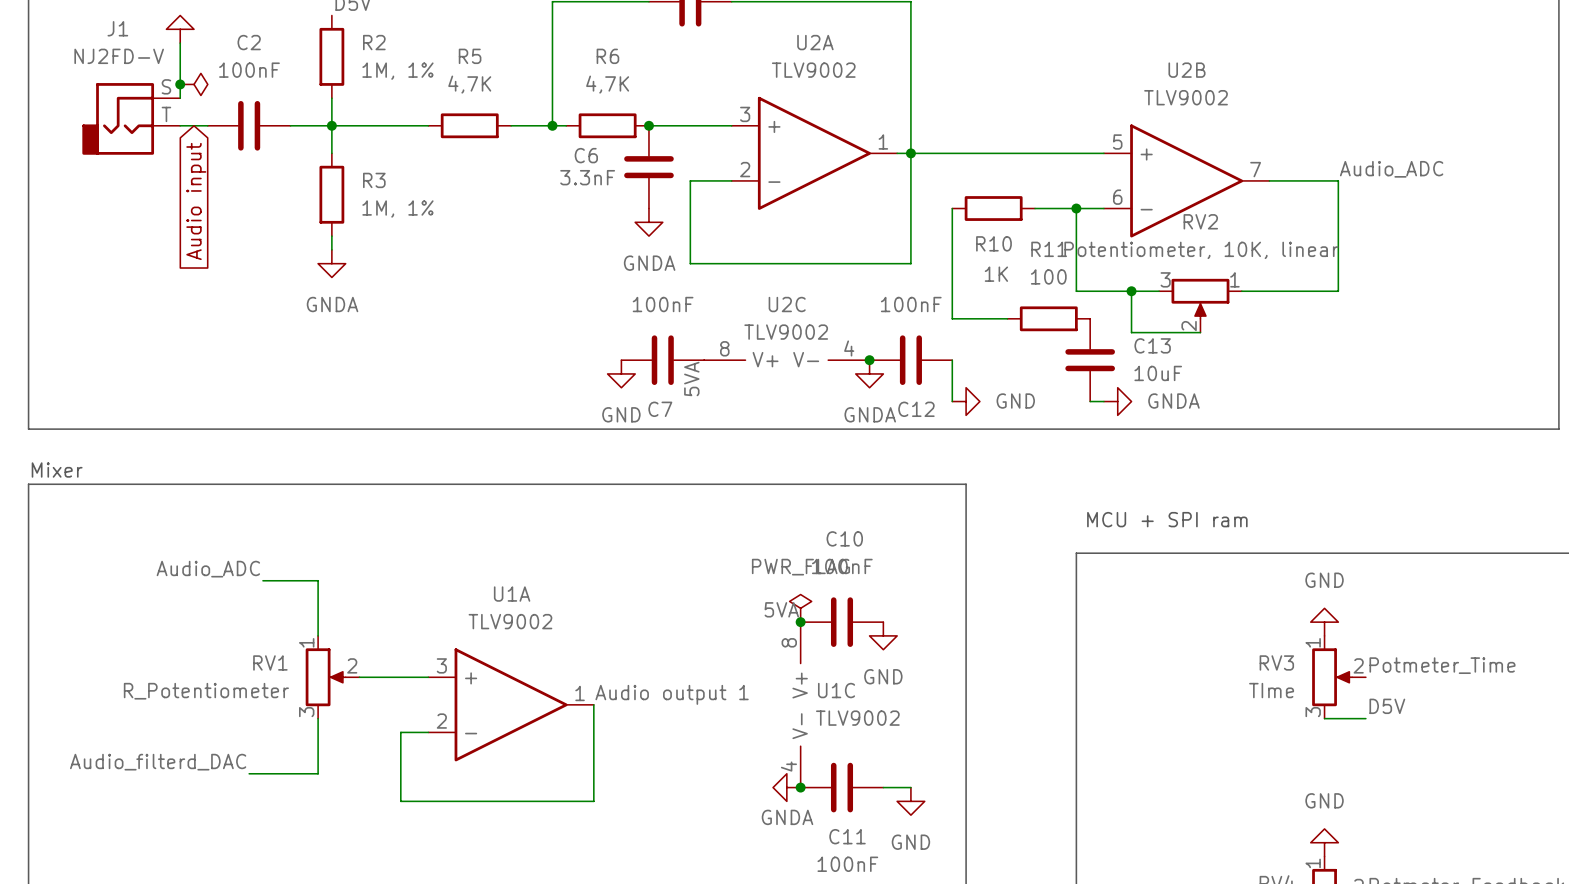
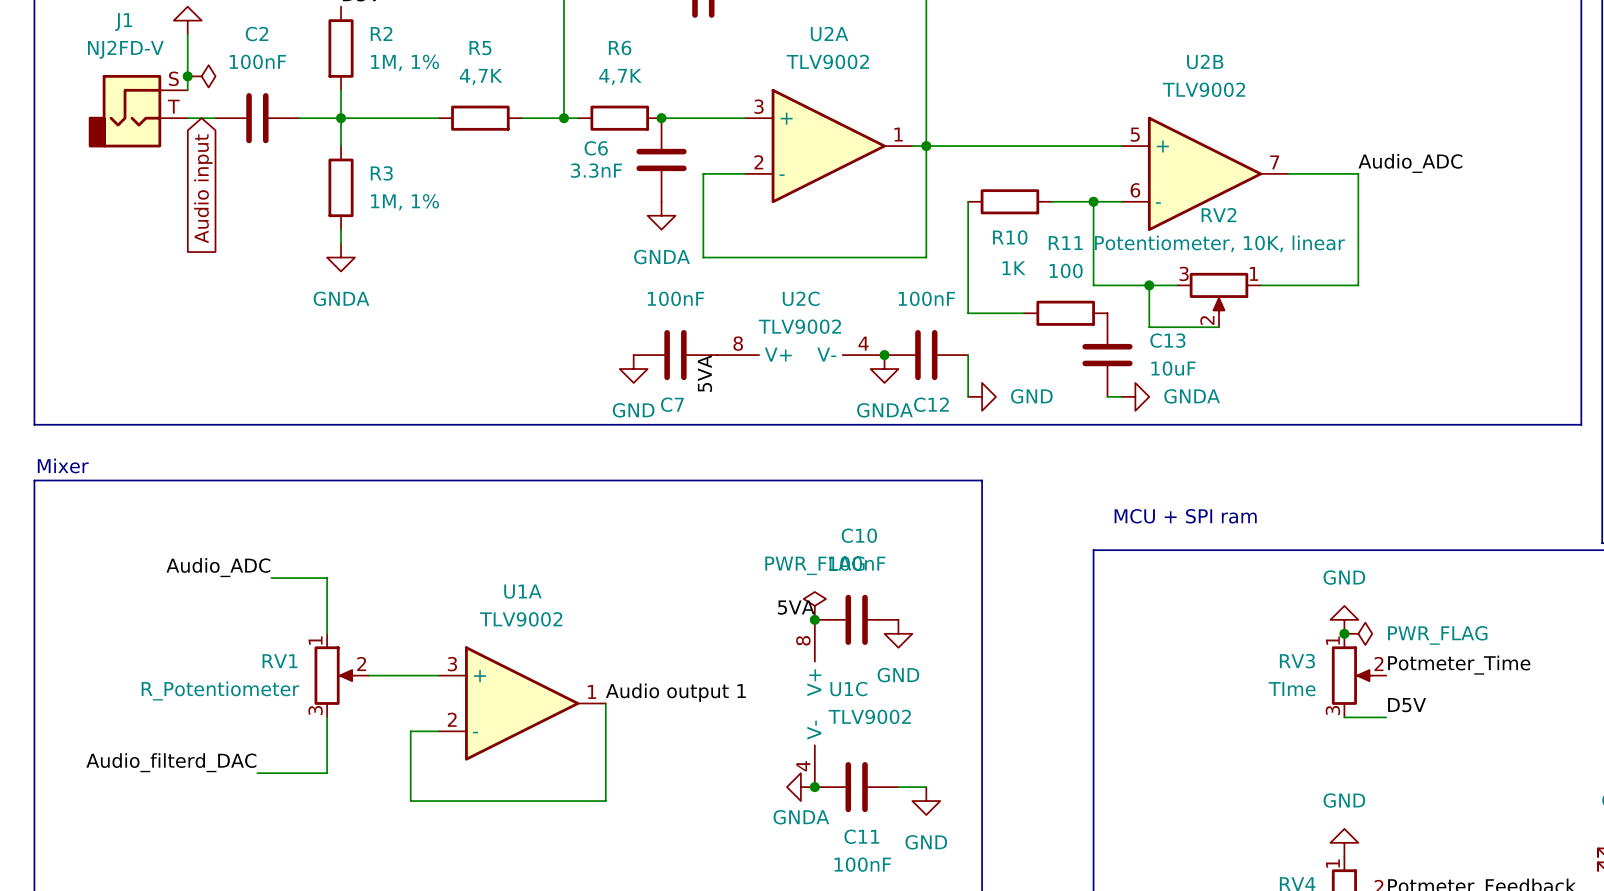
junction: none -> (1344, 633)
power symbol: none -> PWR_FLAG (1358, 633)

